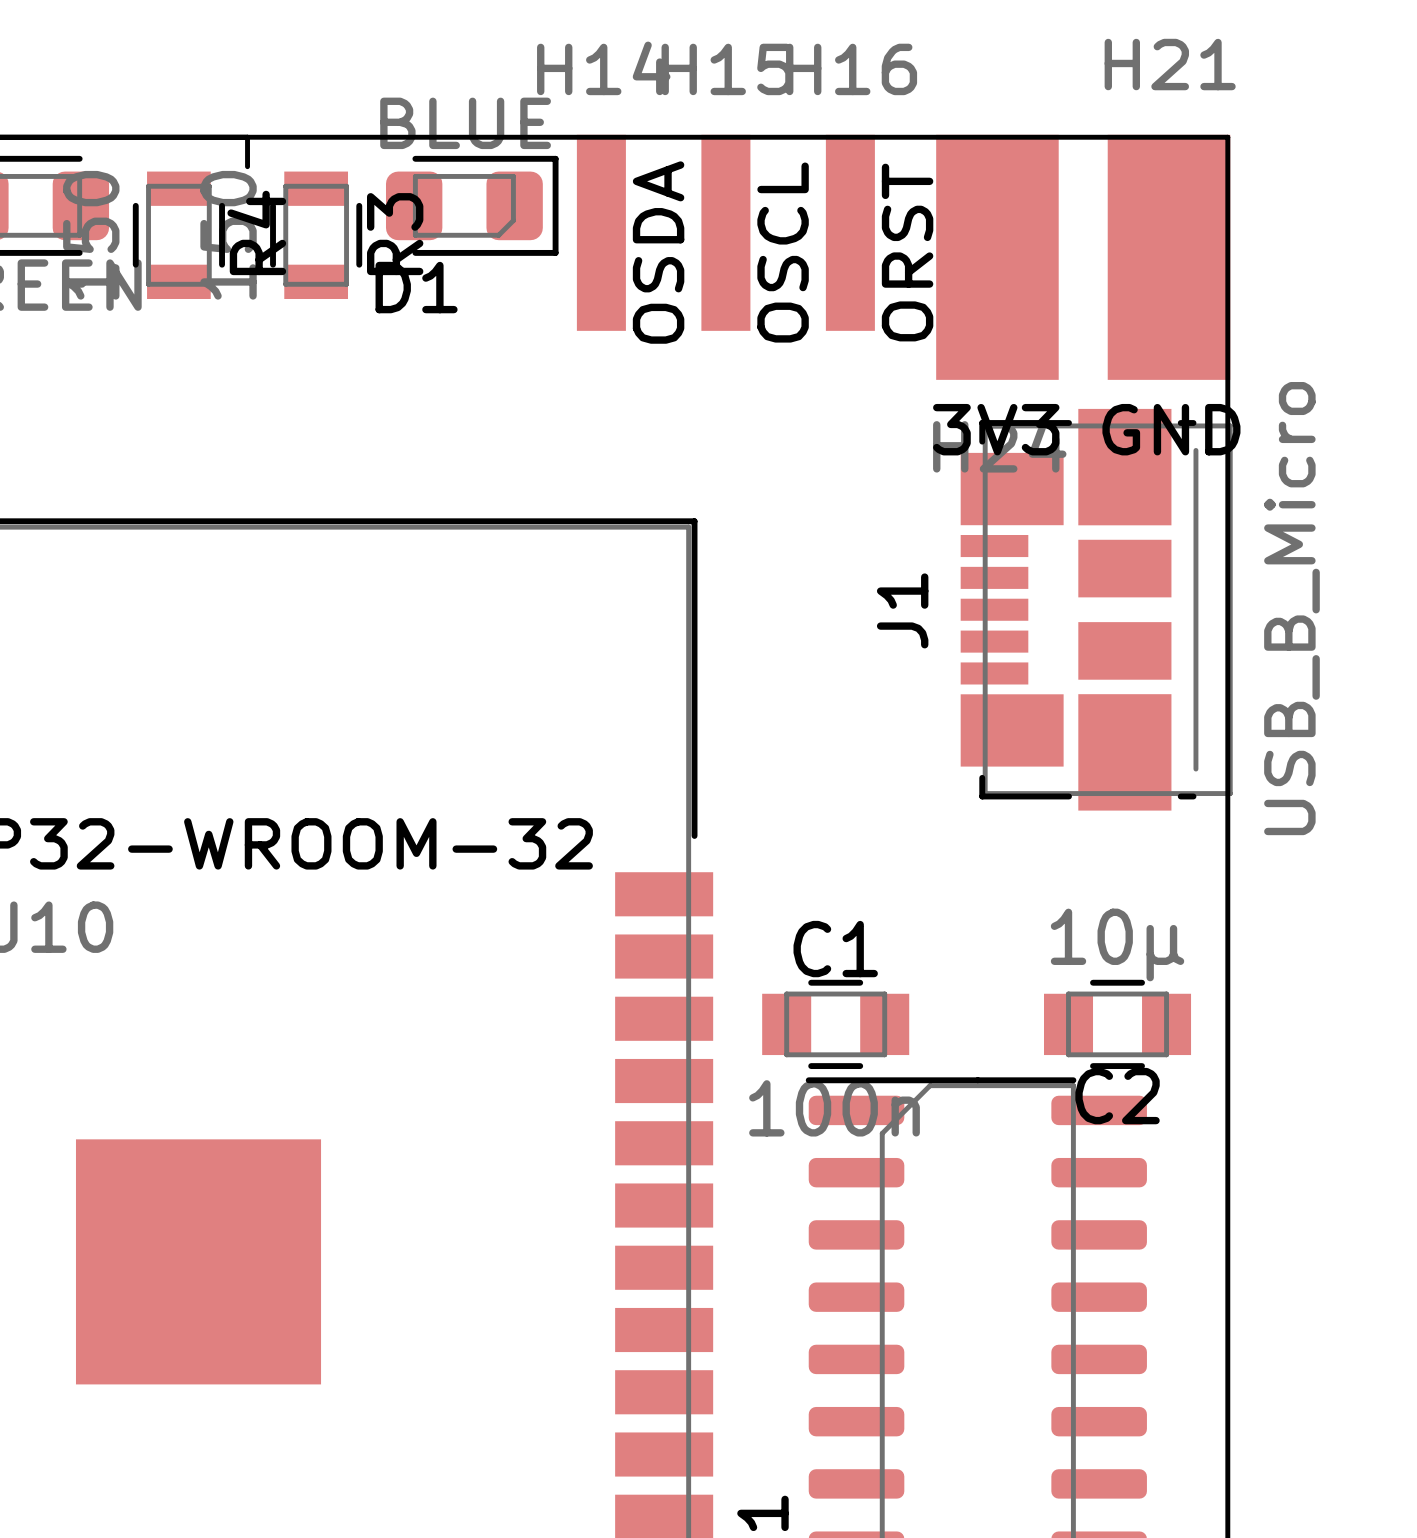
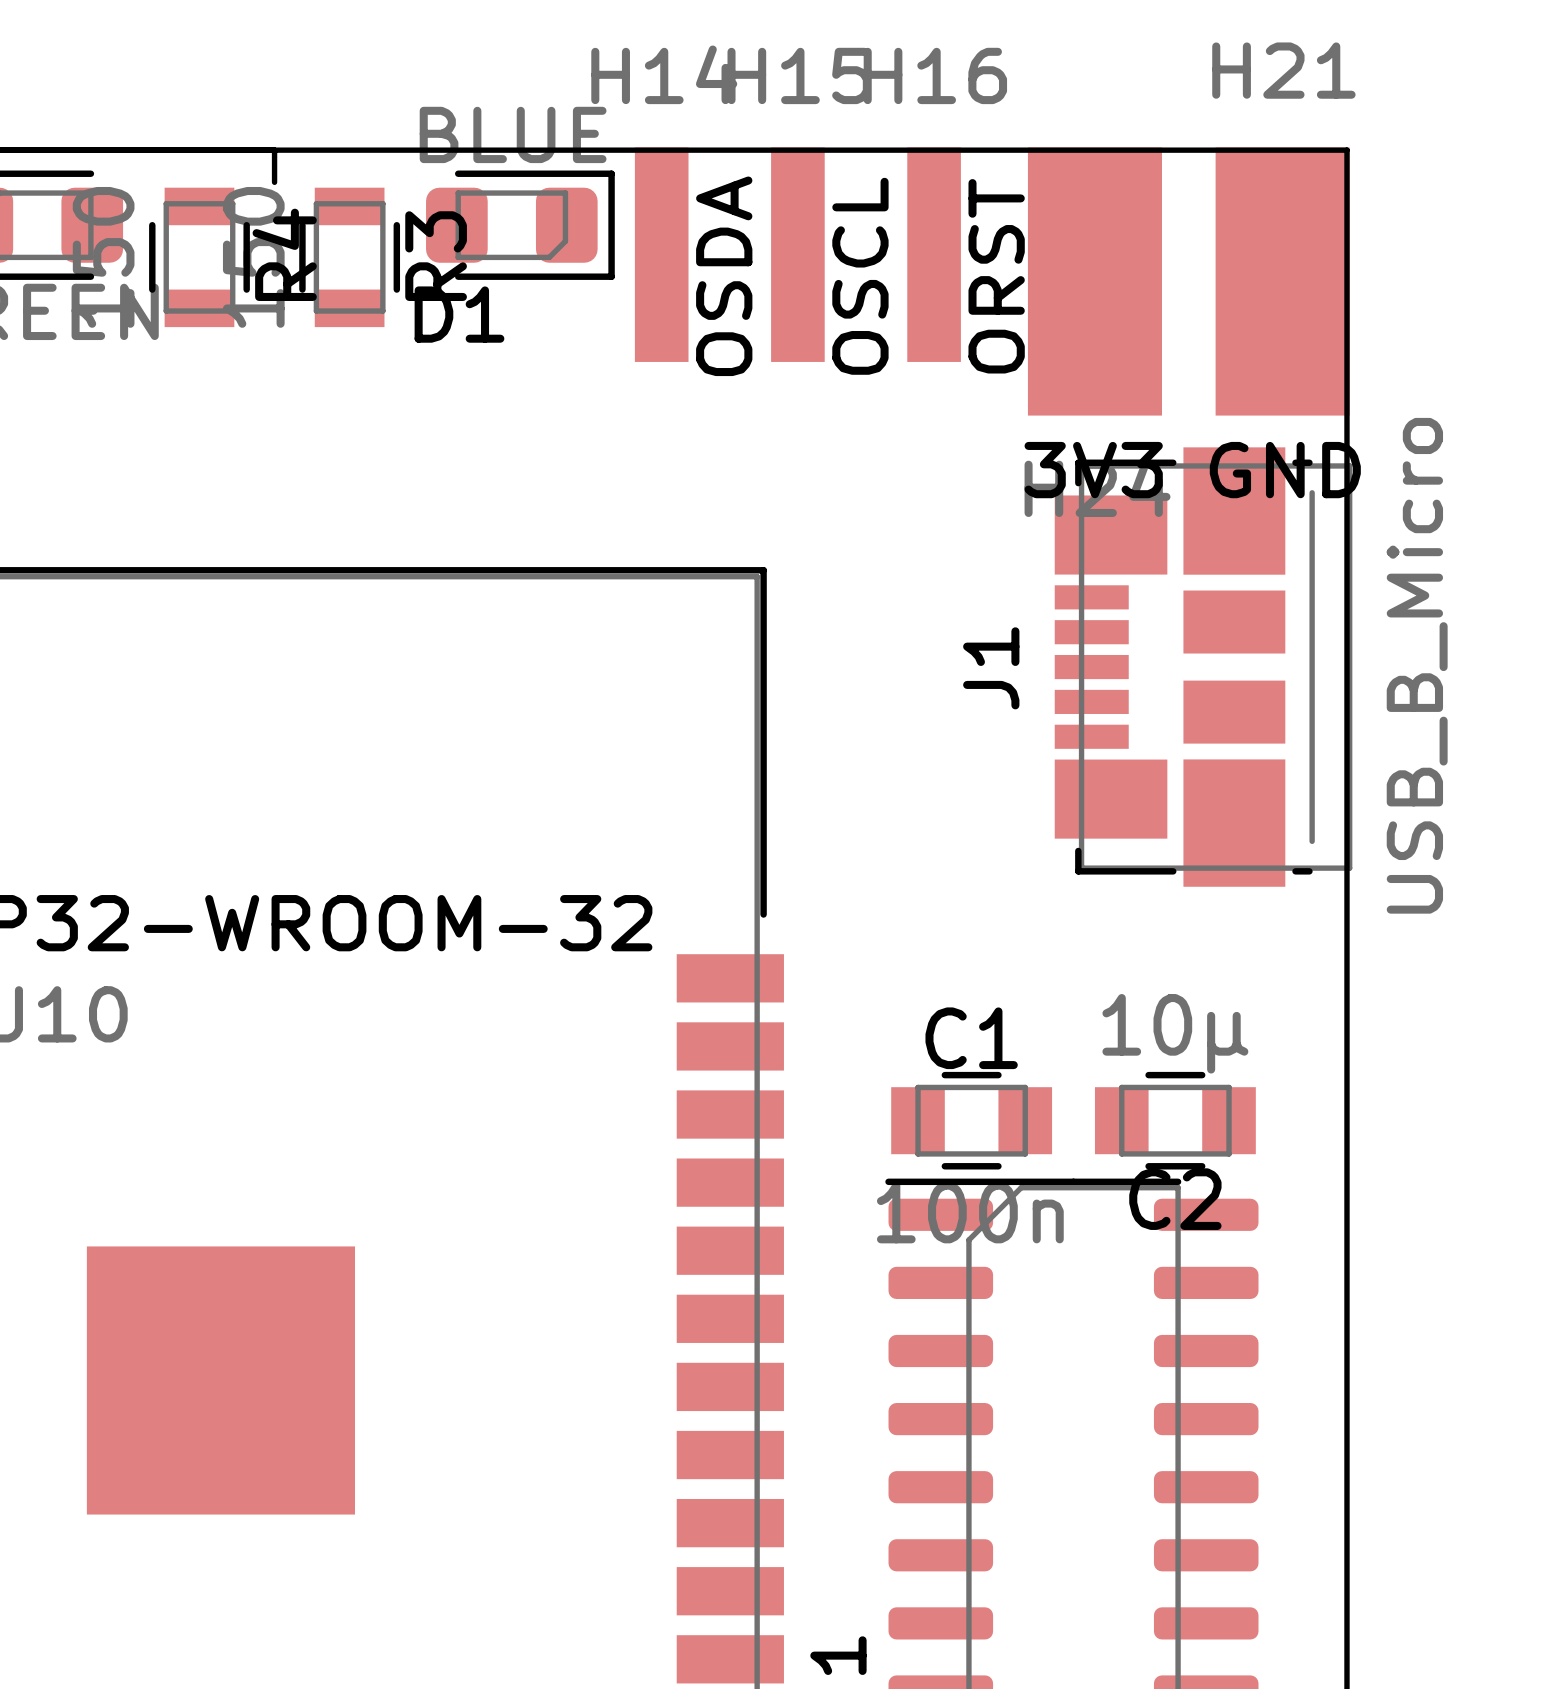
C1 position: (835, 1024) -> (971, 1120)
C2 position: (1117, 1024) -> (1175, 1120)

